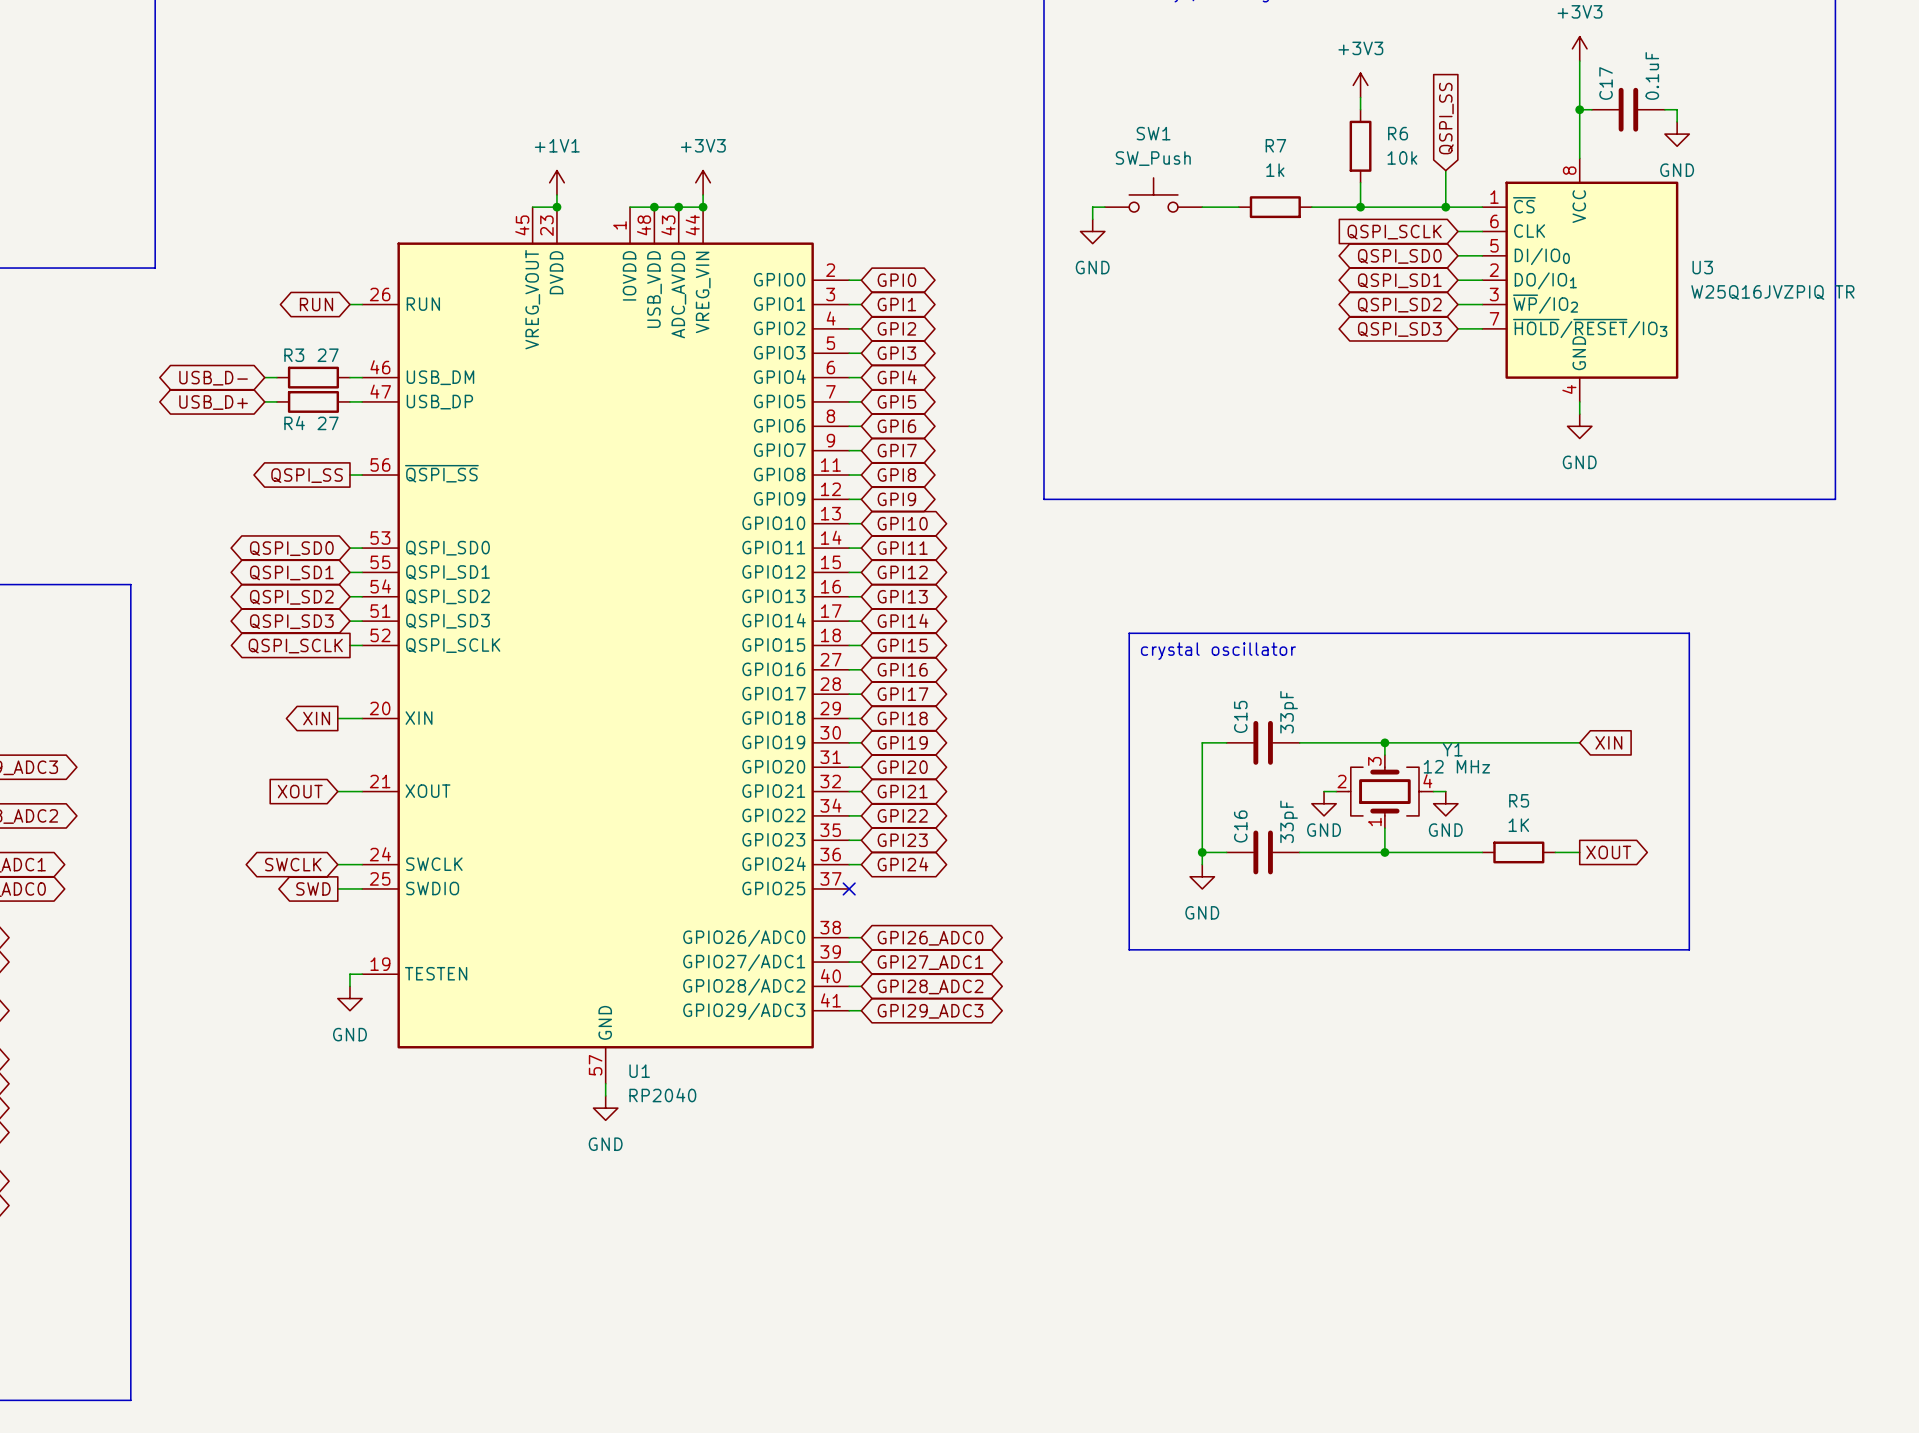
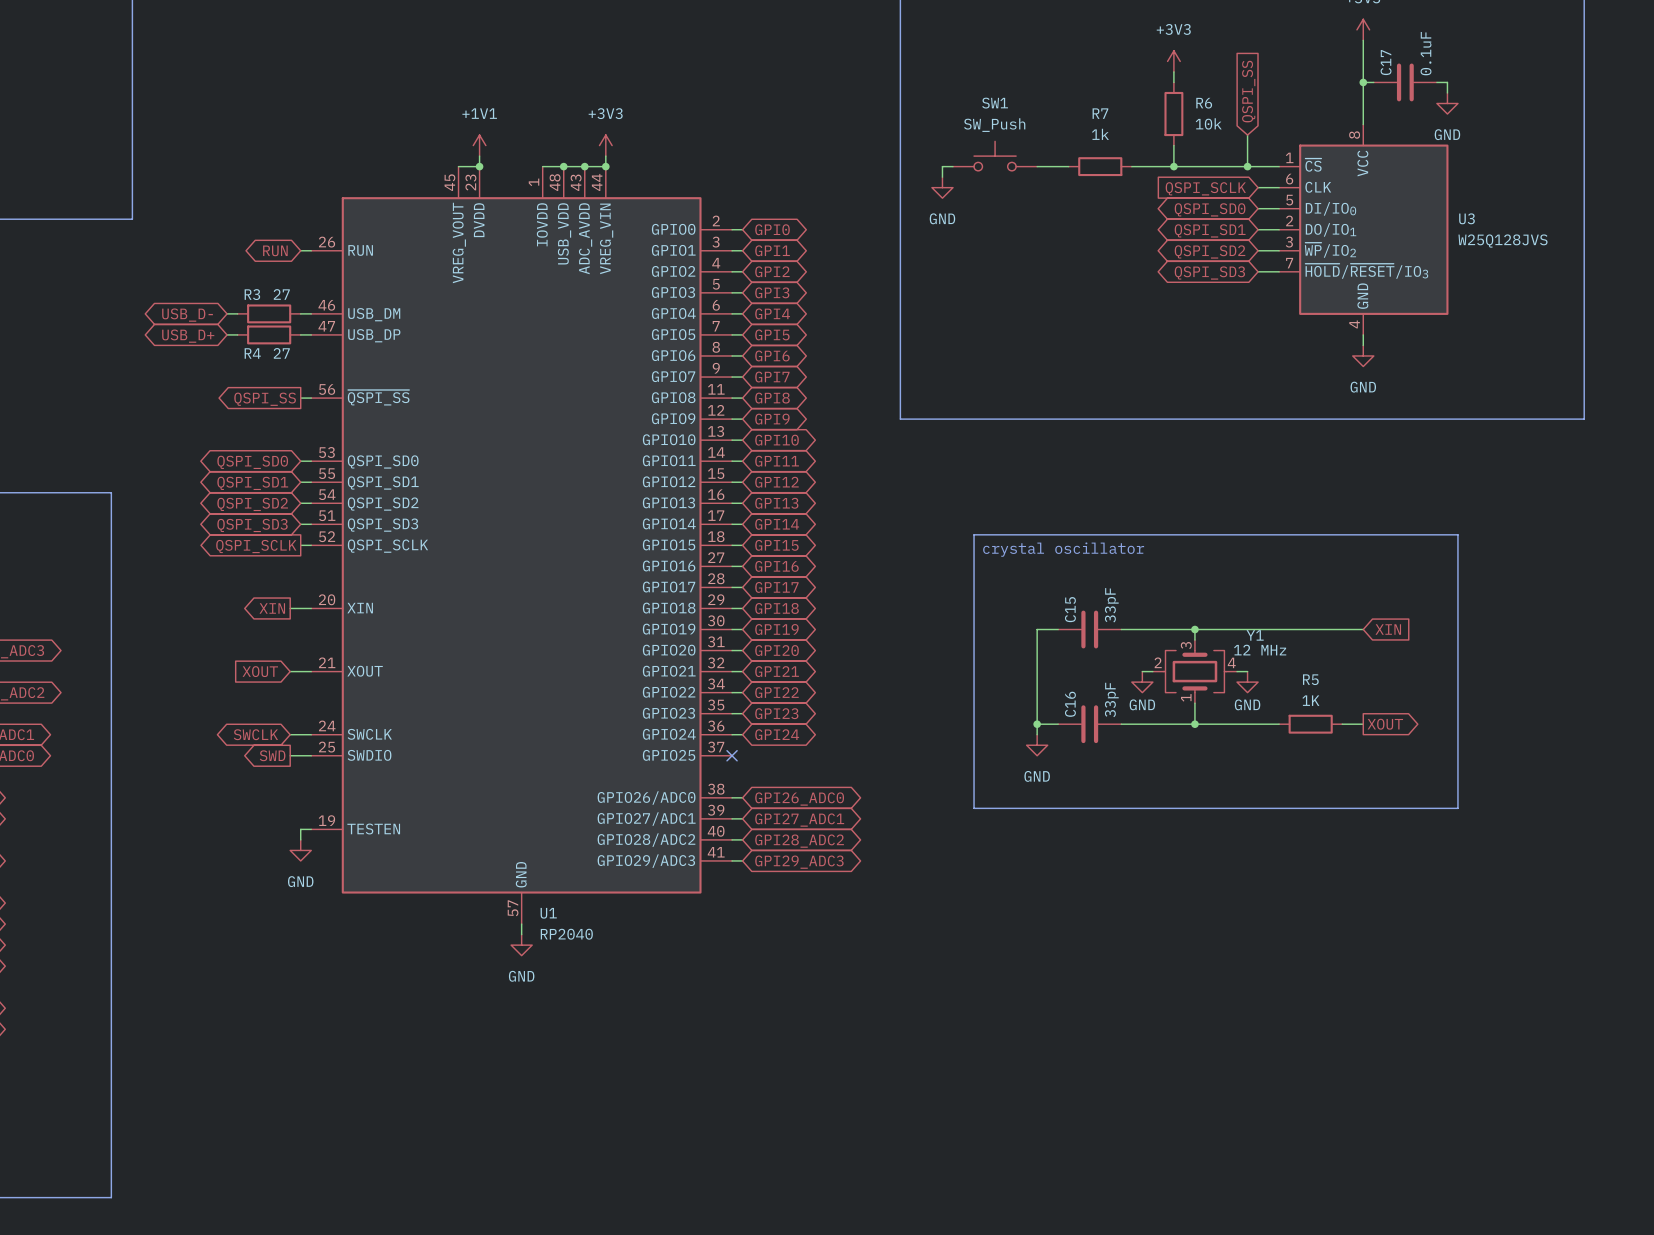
U3 value: W25Q16JVZPIQ TR (1772, 292) -> W25Q128JVS (1503, 241)

